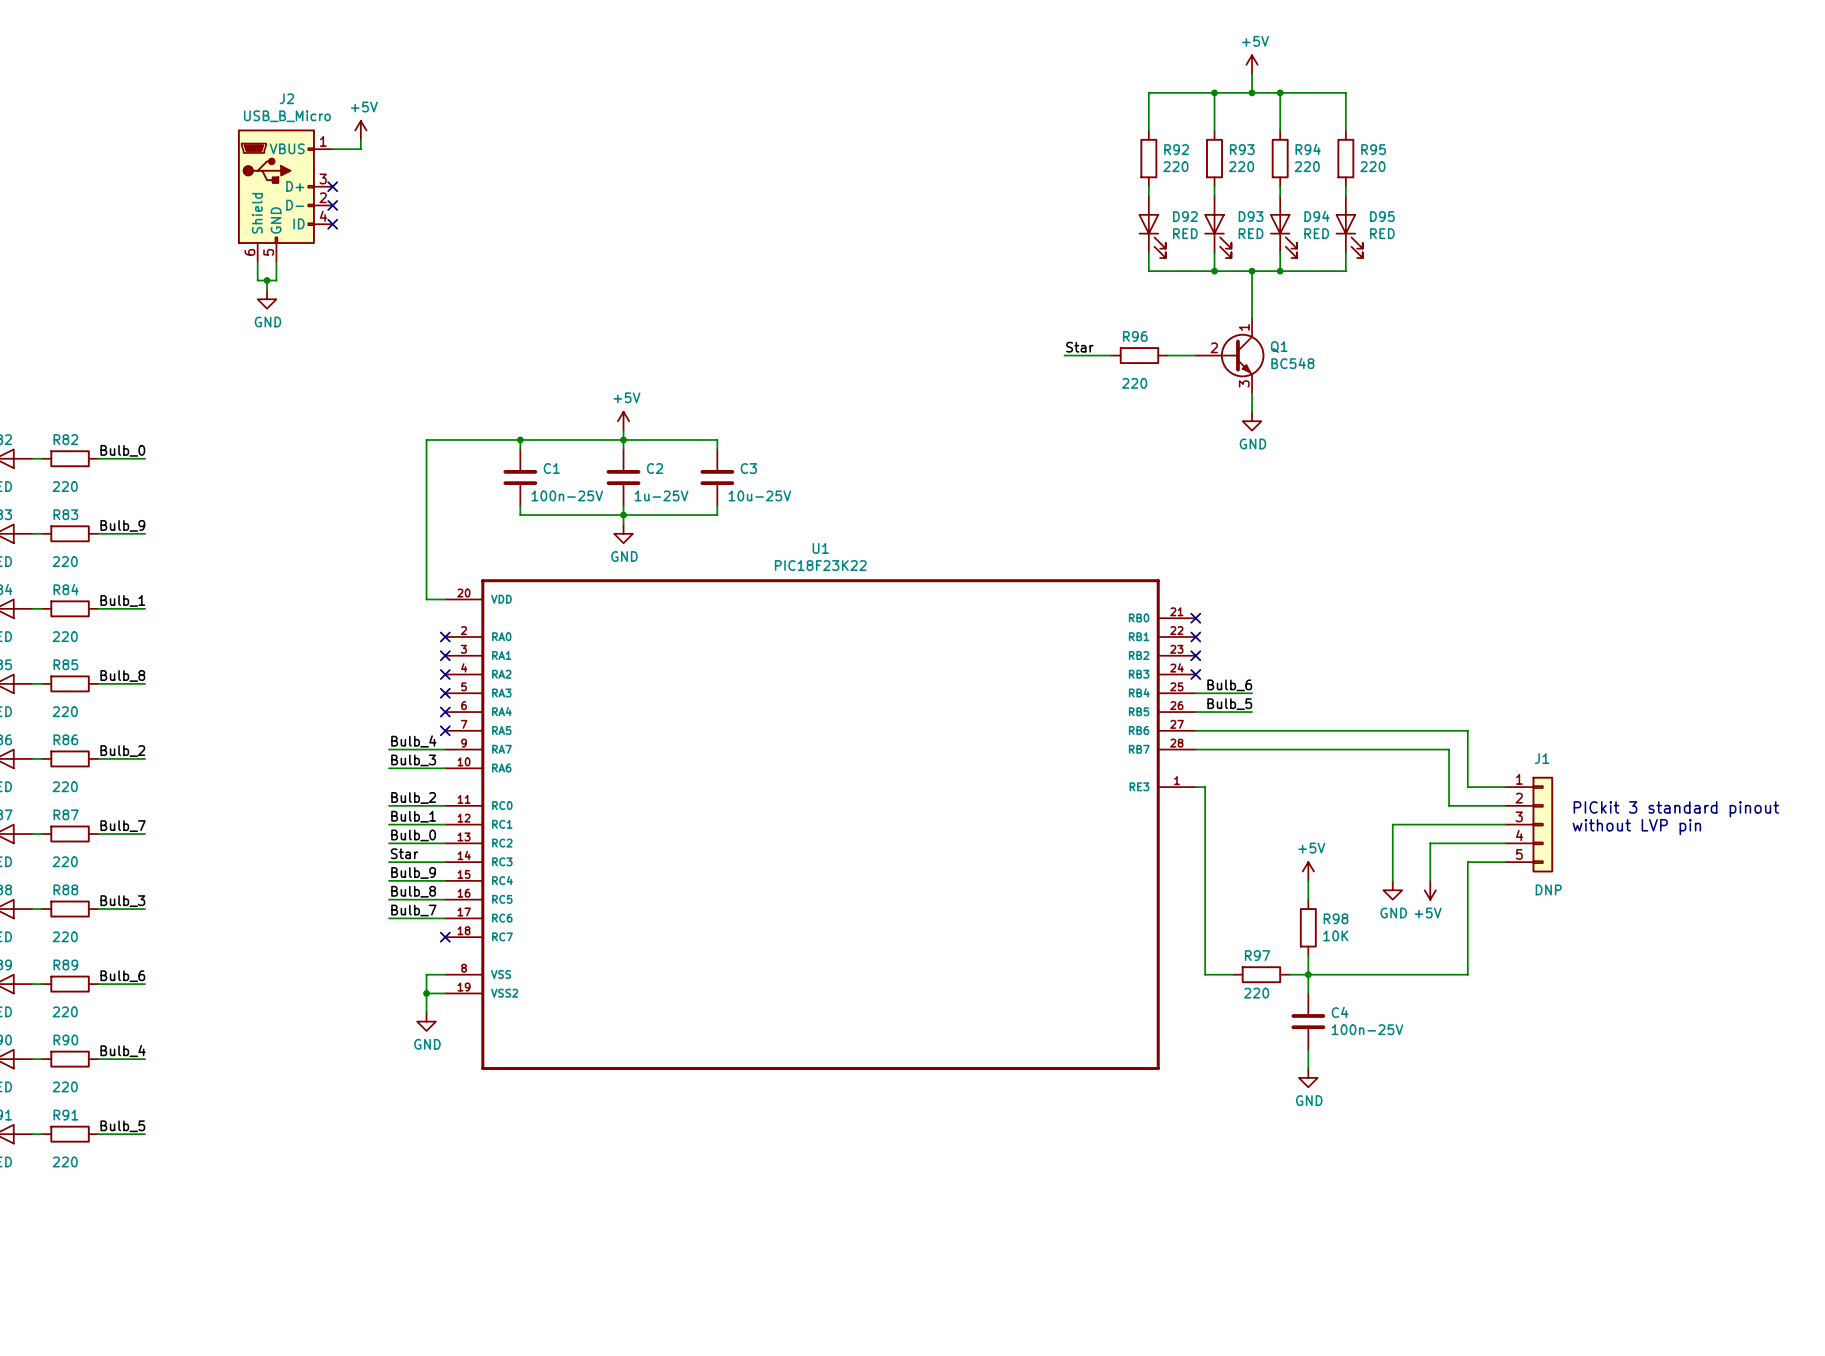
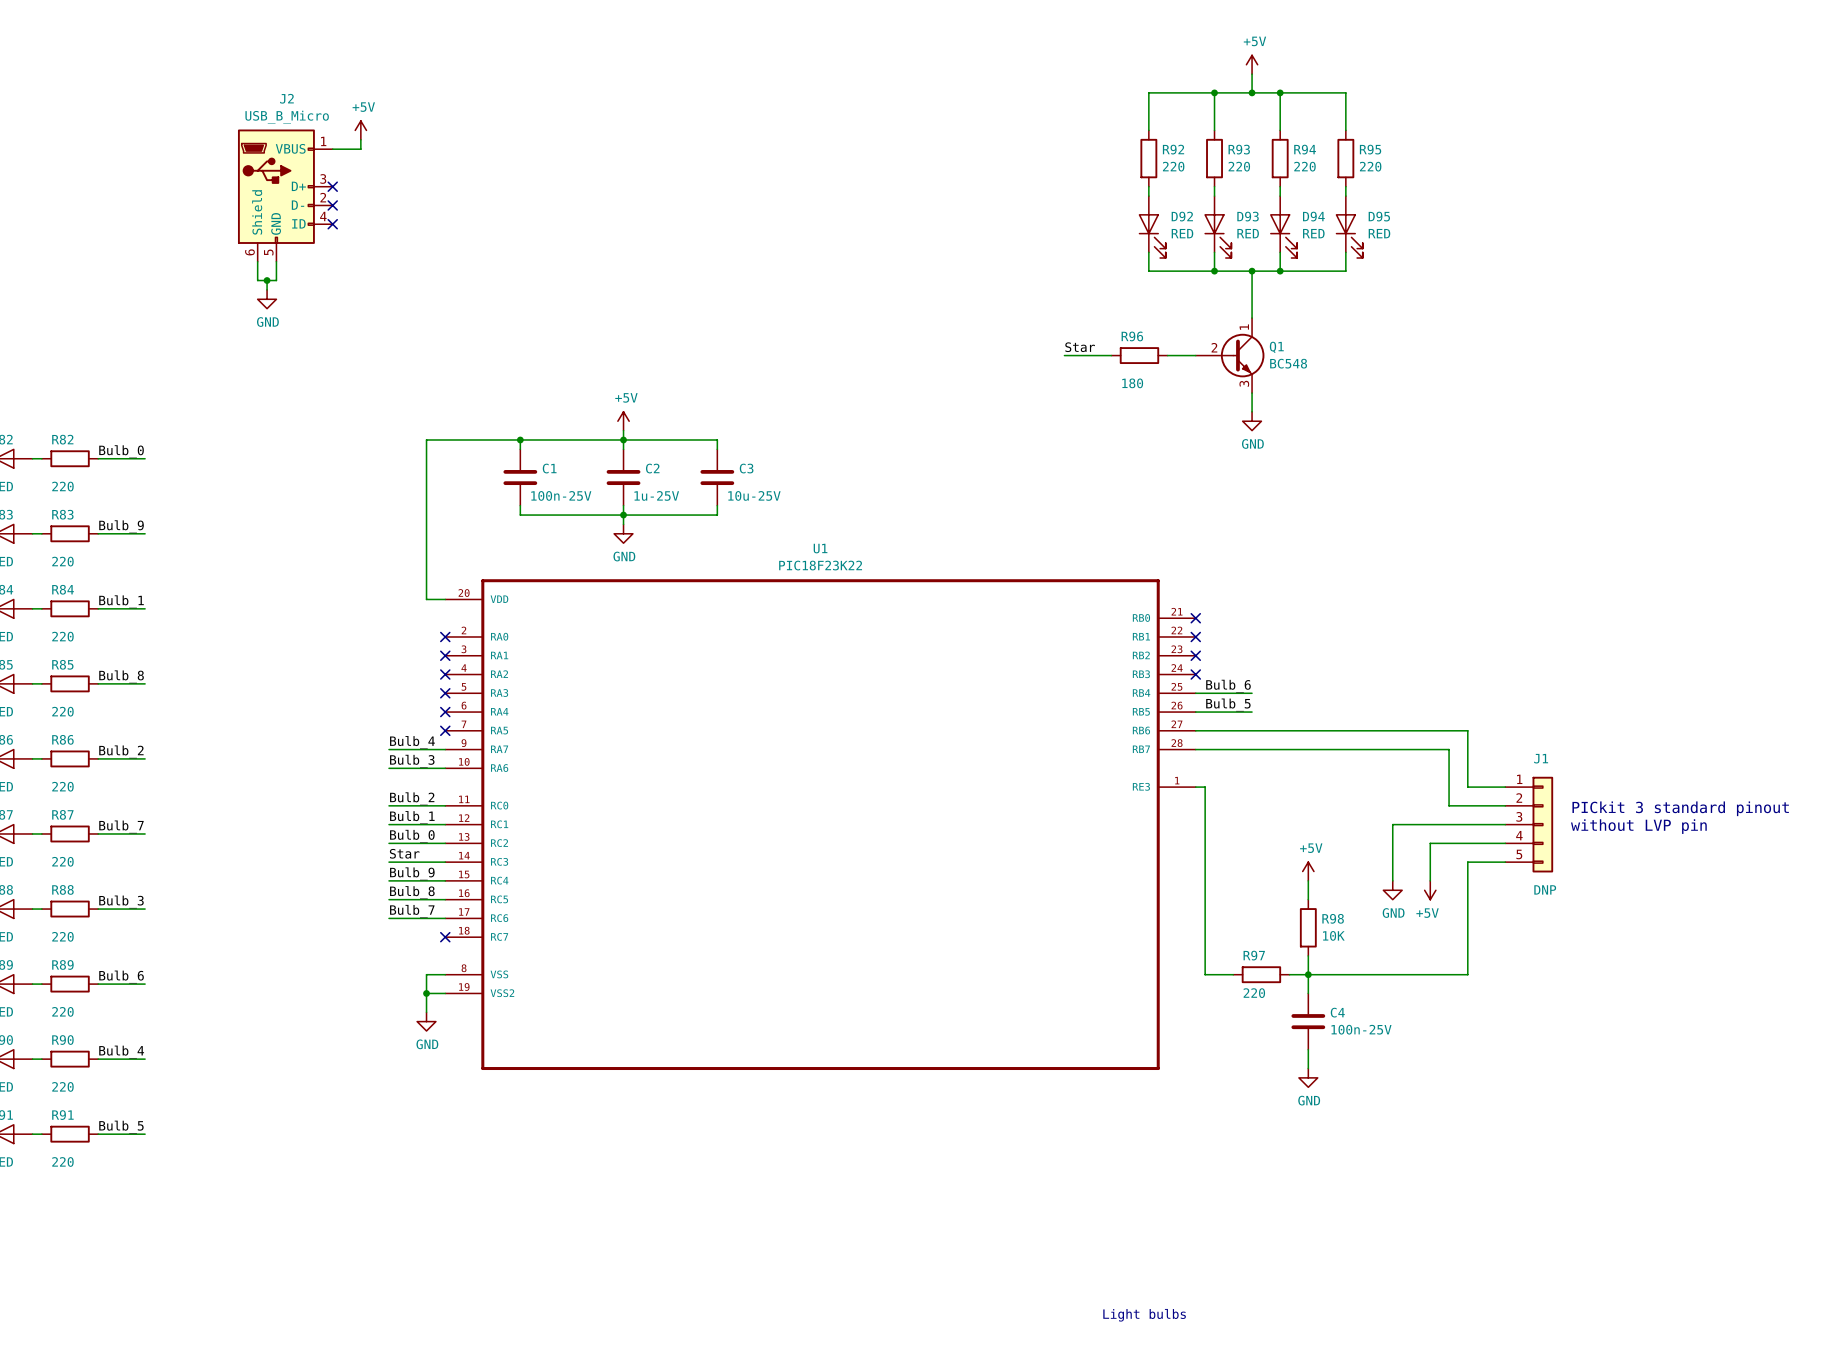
R96 value: 220 (1134, 383) -> 180 (1132, 383)
text: none -> Light bulbs (1144, 1315)

